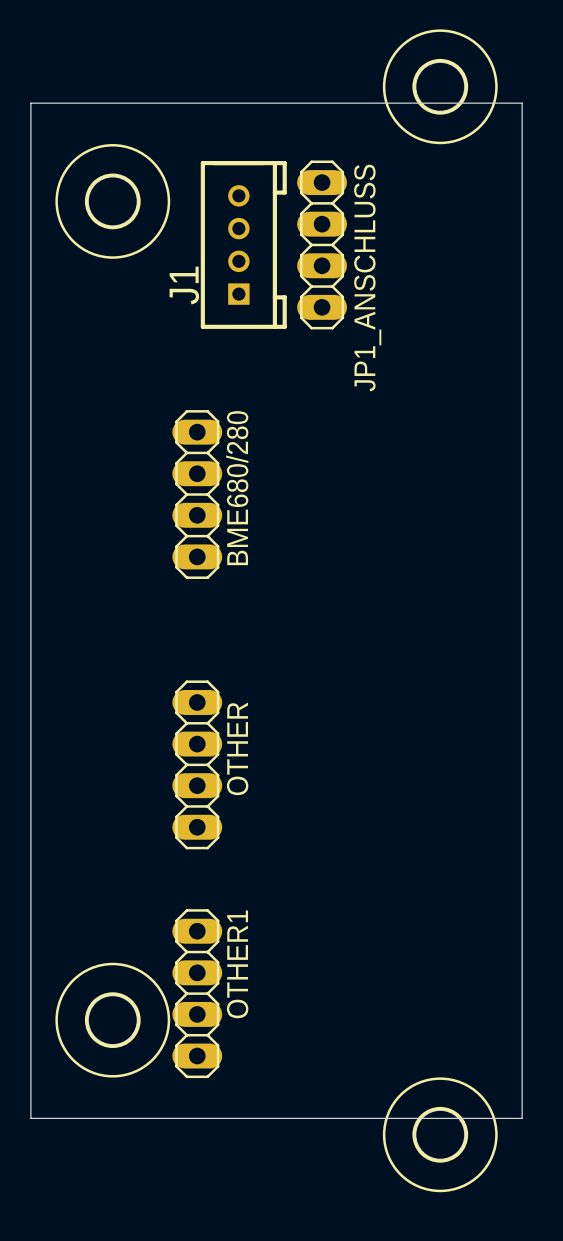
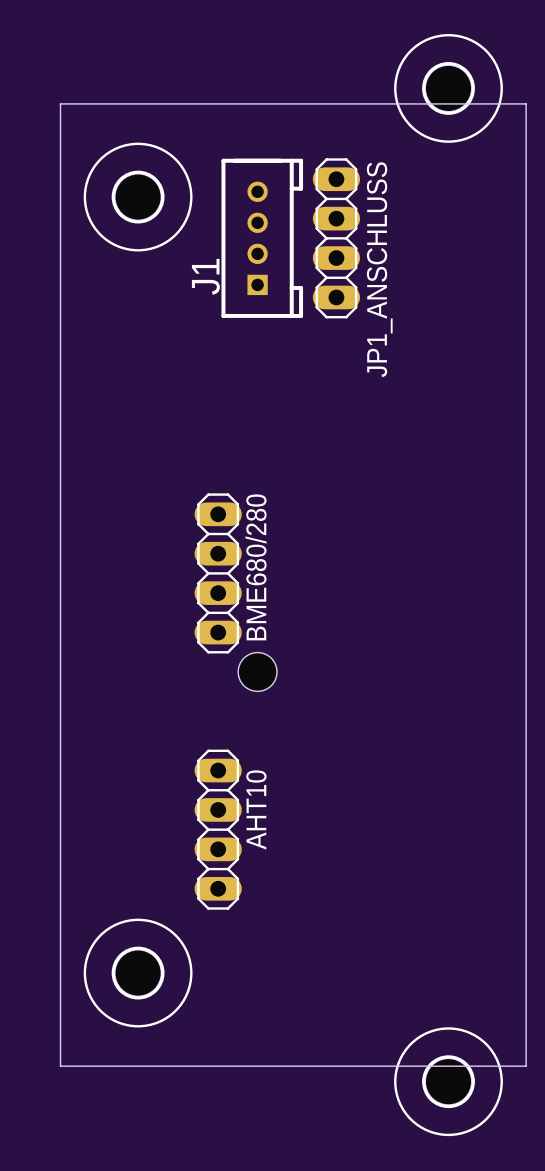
BME680/280 position: (197, 494) -> (218, 573)
hole: none -> (257, 671)
OTHER: (197, 764) -> none
AHT10: none -> (218, 829)
OTHER1: (197, 993) -> none

